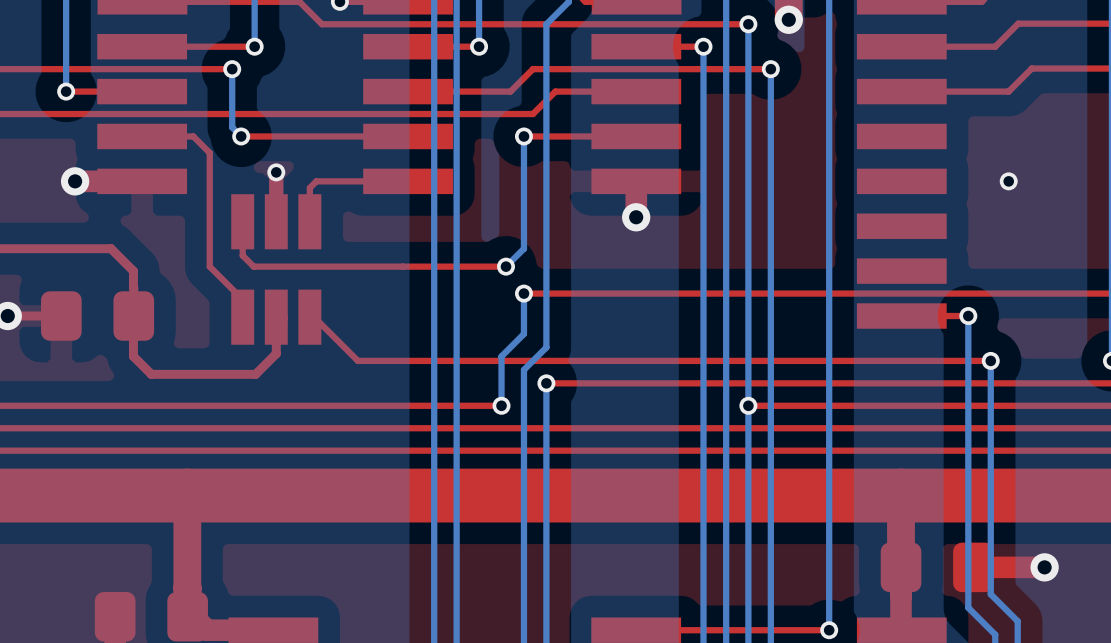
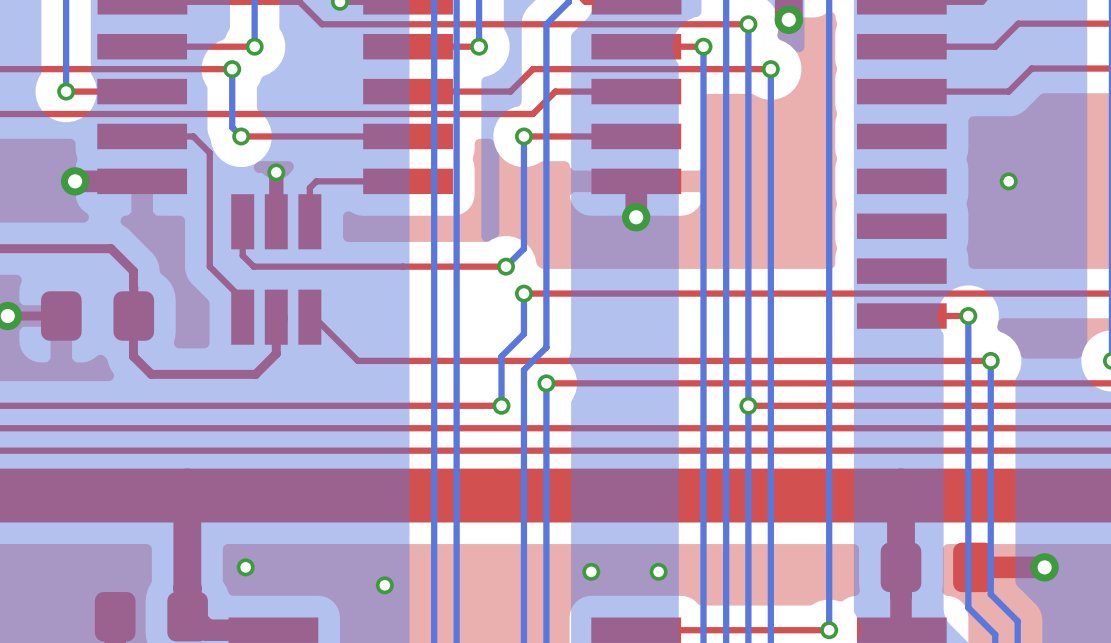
via: none -> (245, 567)
via: none -> (591, 571)
via: none -> (658, 571)
via: none -> (384, 585)

